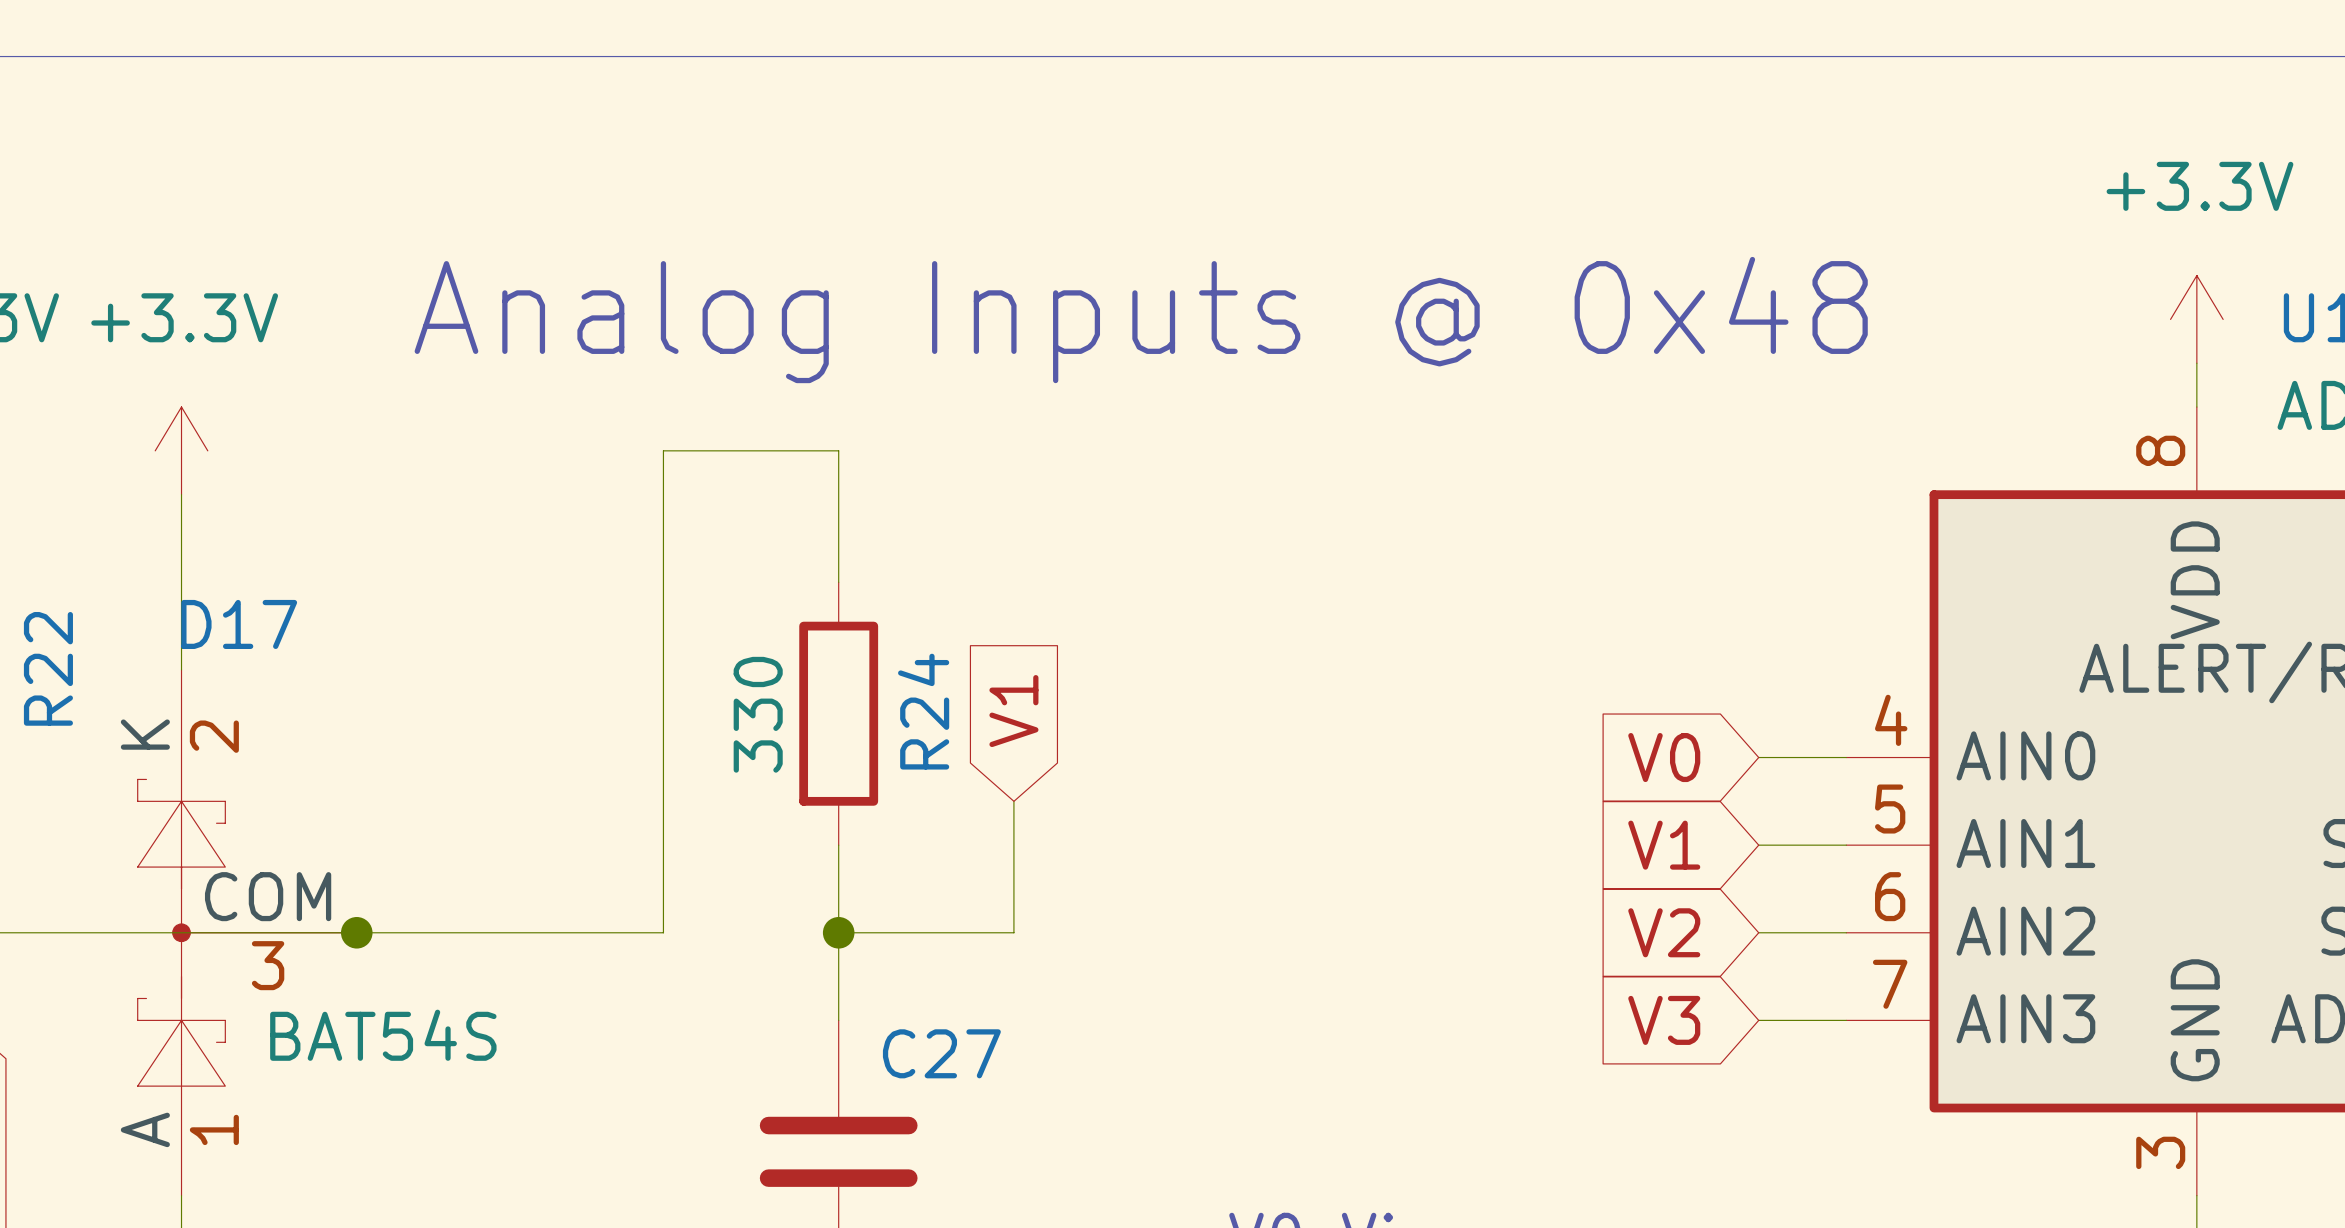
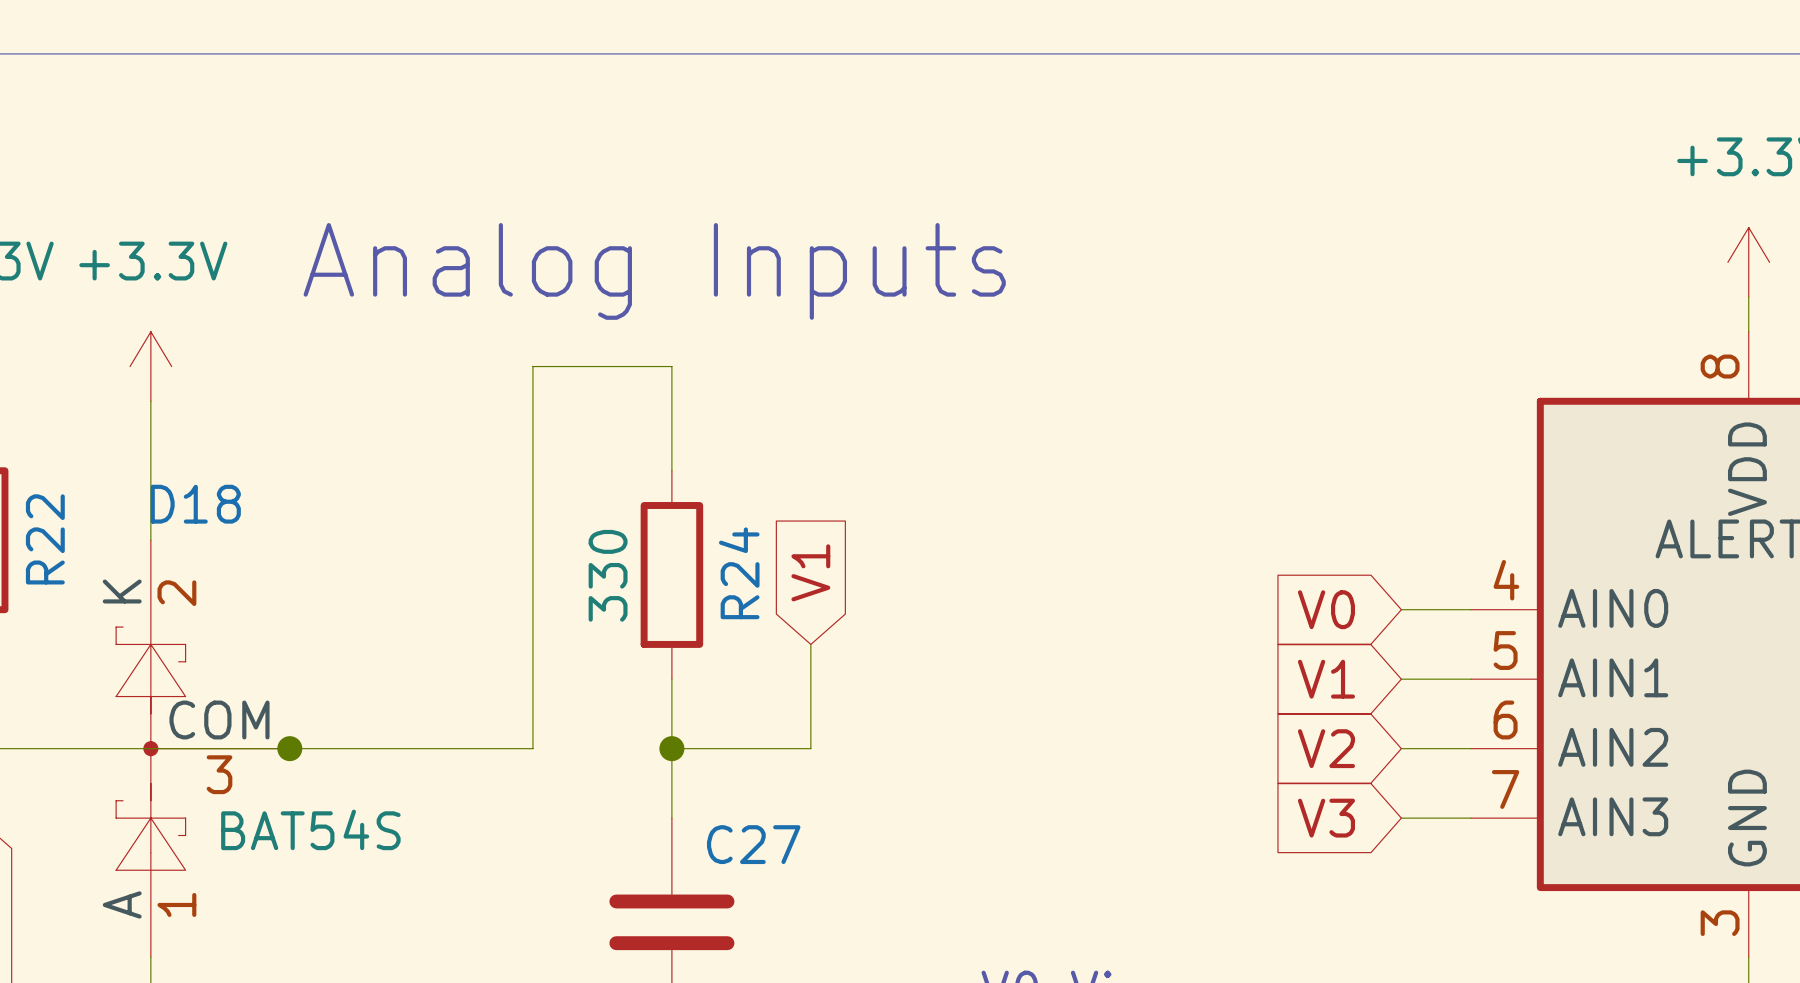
text: Analog Inputs @ 0x48 (1141, 320) -> Analog Inputs (654, 271)
D17 name: D17 (239, 624) -> D18 (195, 504)

